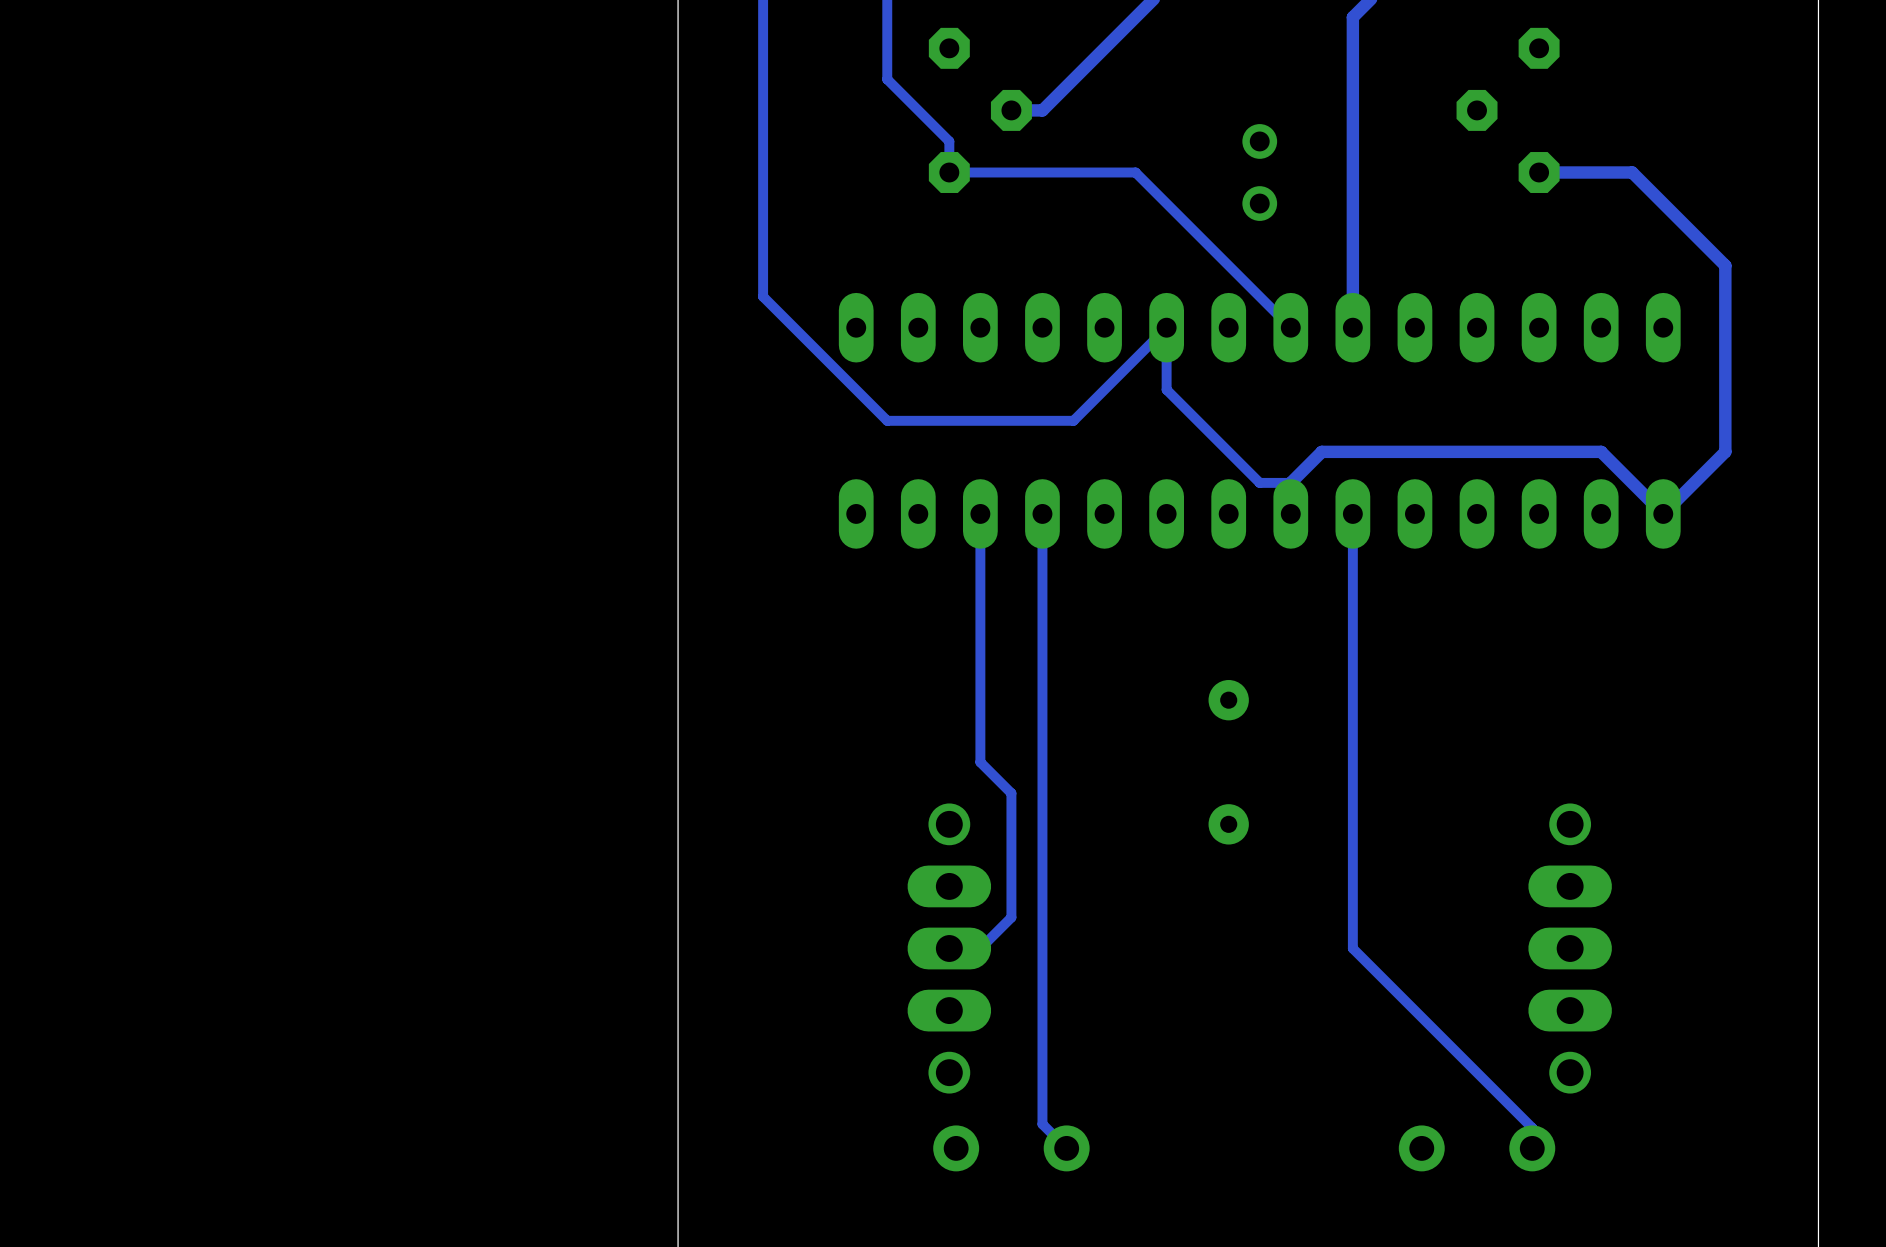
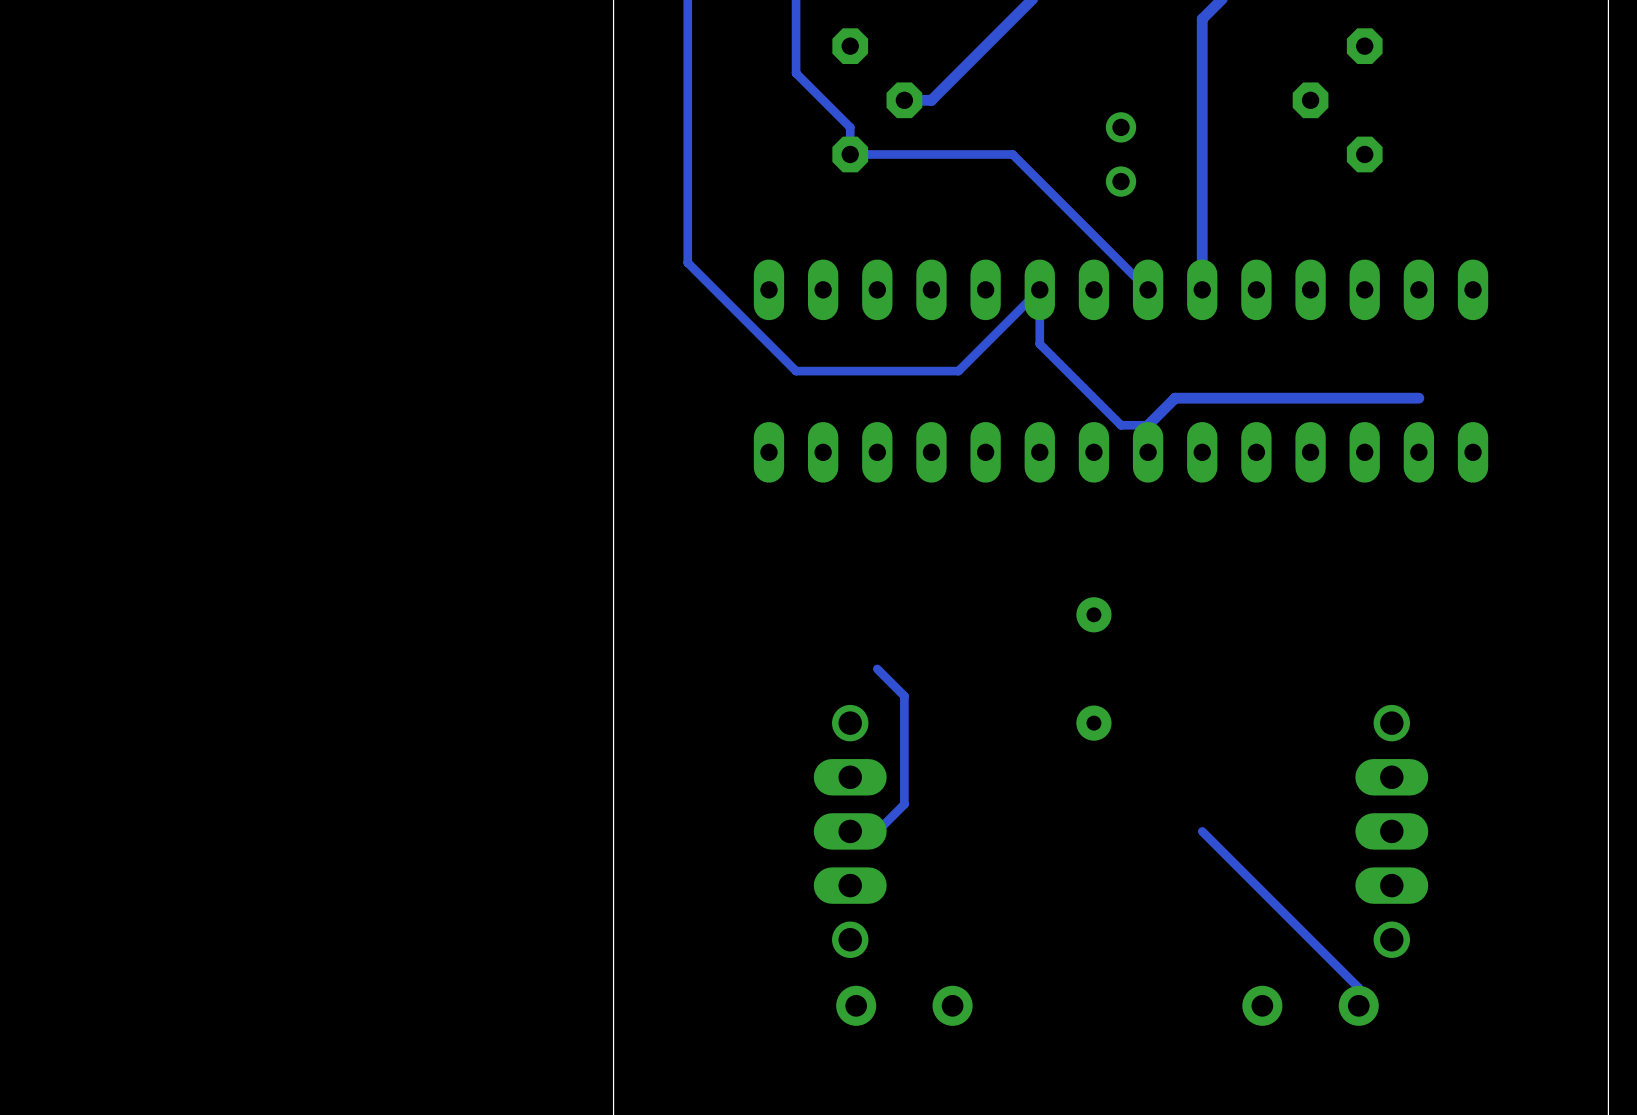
track: (1539, 172) (1632, 172) (1725, 265) (1725, 451) (1663, 513) (1601, 451) -> none
track: (980, 513) (980, 762) -> none
track: (1042, 513) (1042, 1124) (1066, 1148) -> none
track: (1352, 513) (1352, 948) -> none

